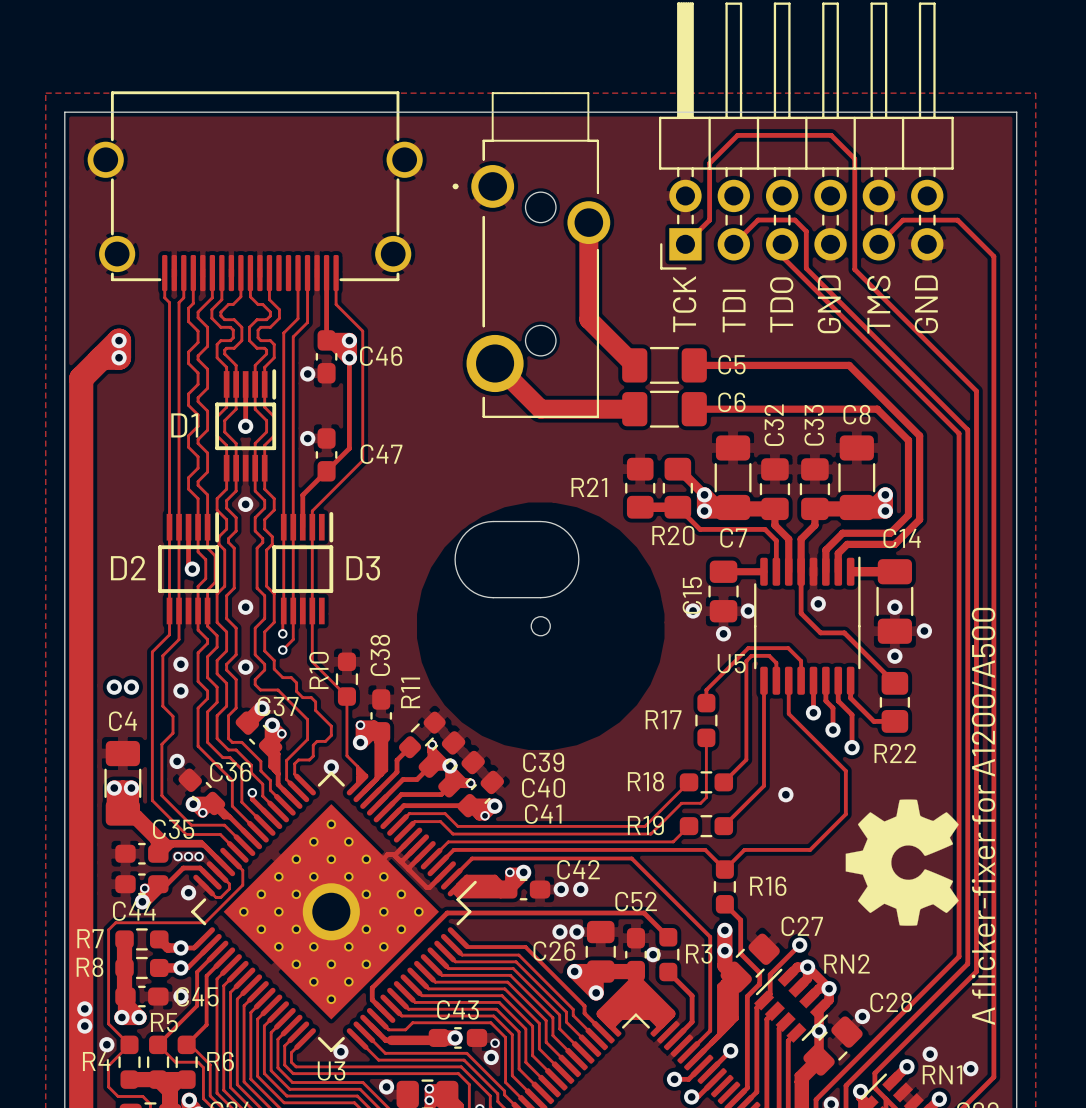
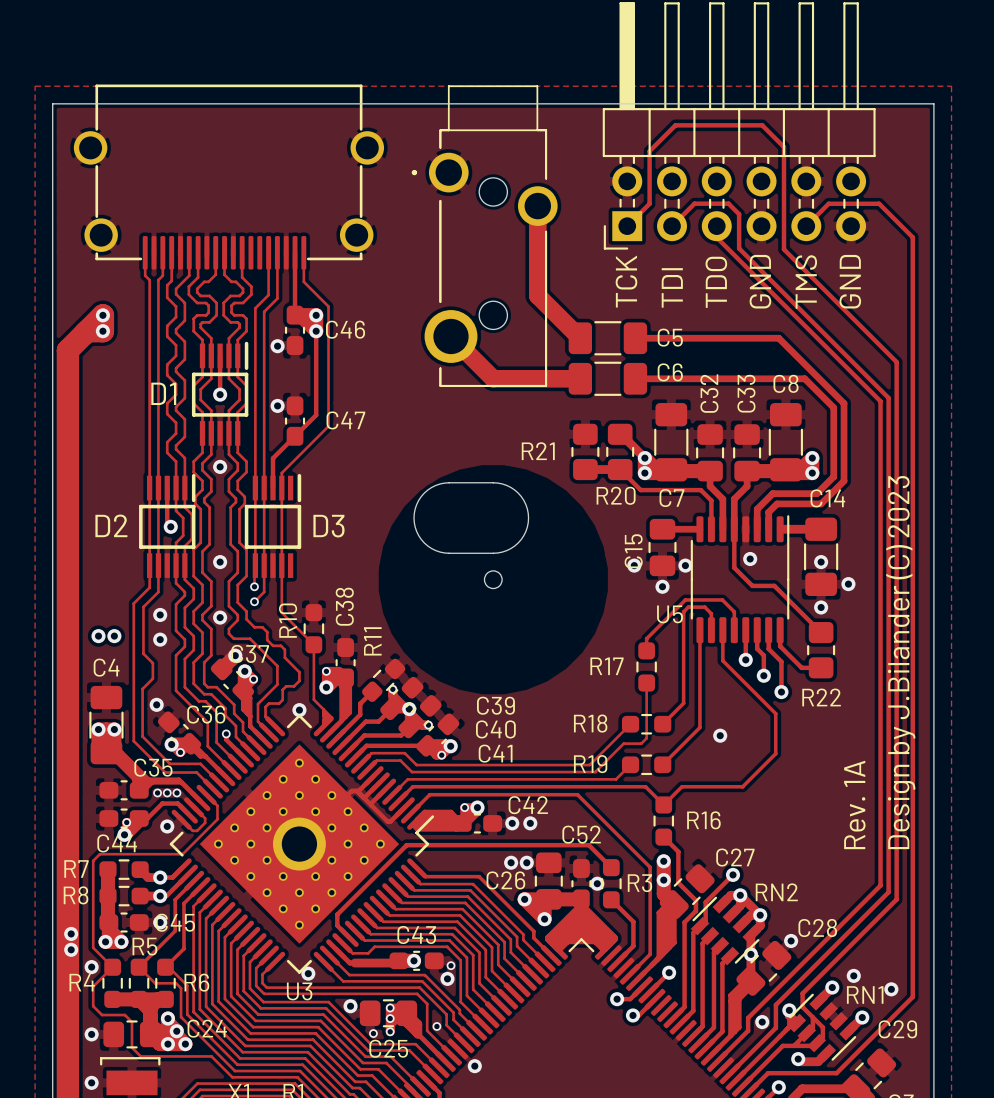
text: none -> Design by J.Bilander (C) 2023 (900, 662)
drawing: [845, 799, 959, 926] -> none
text: A flicker-fixer for A1200/A500 (983, 816) -> none
text: none -> Rev. 1A (854, 804)

